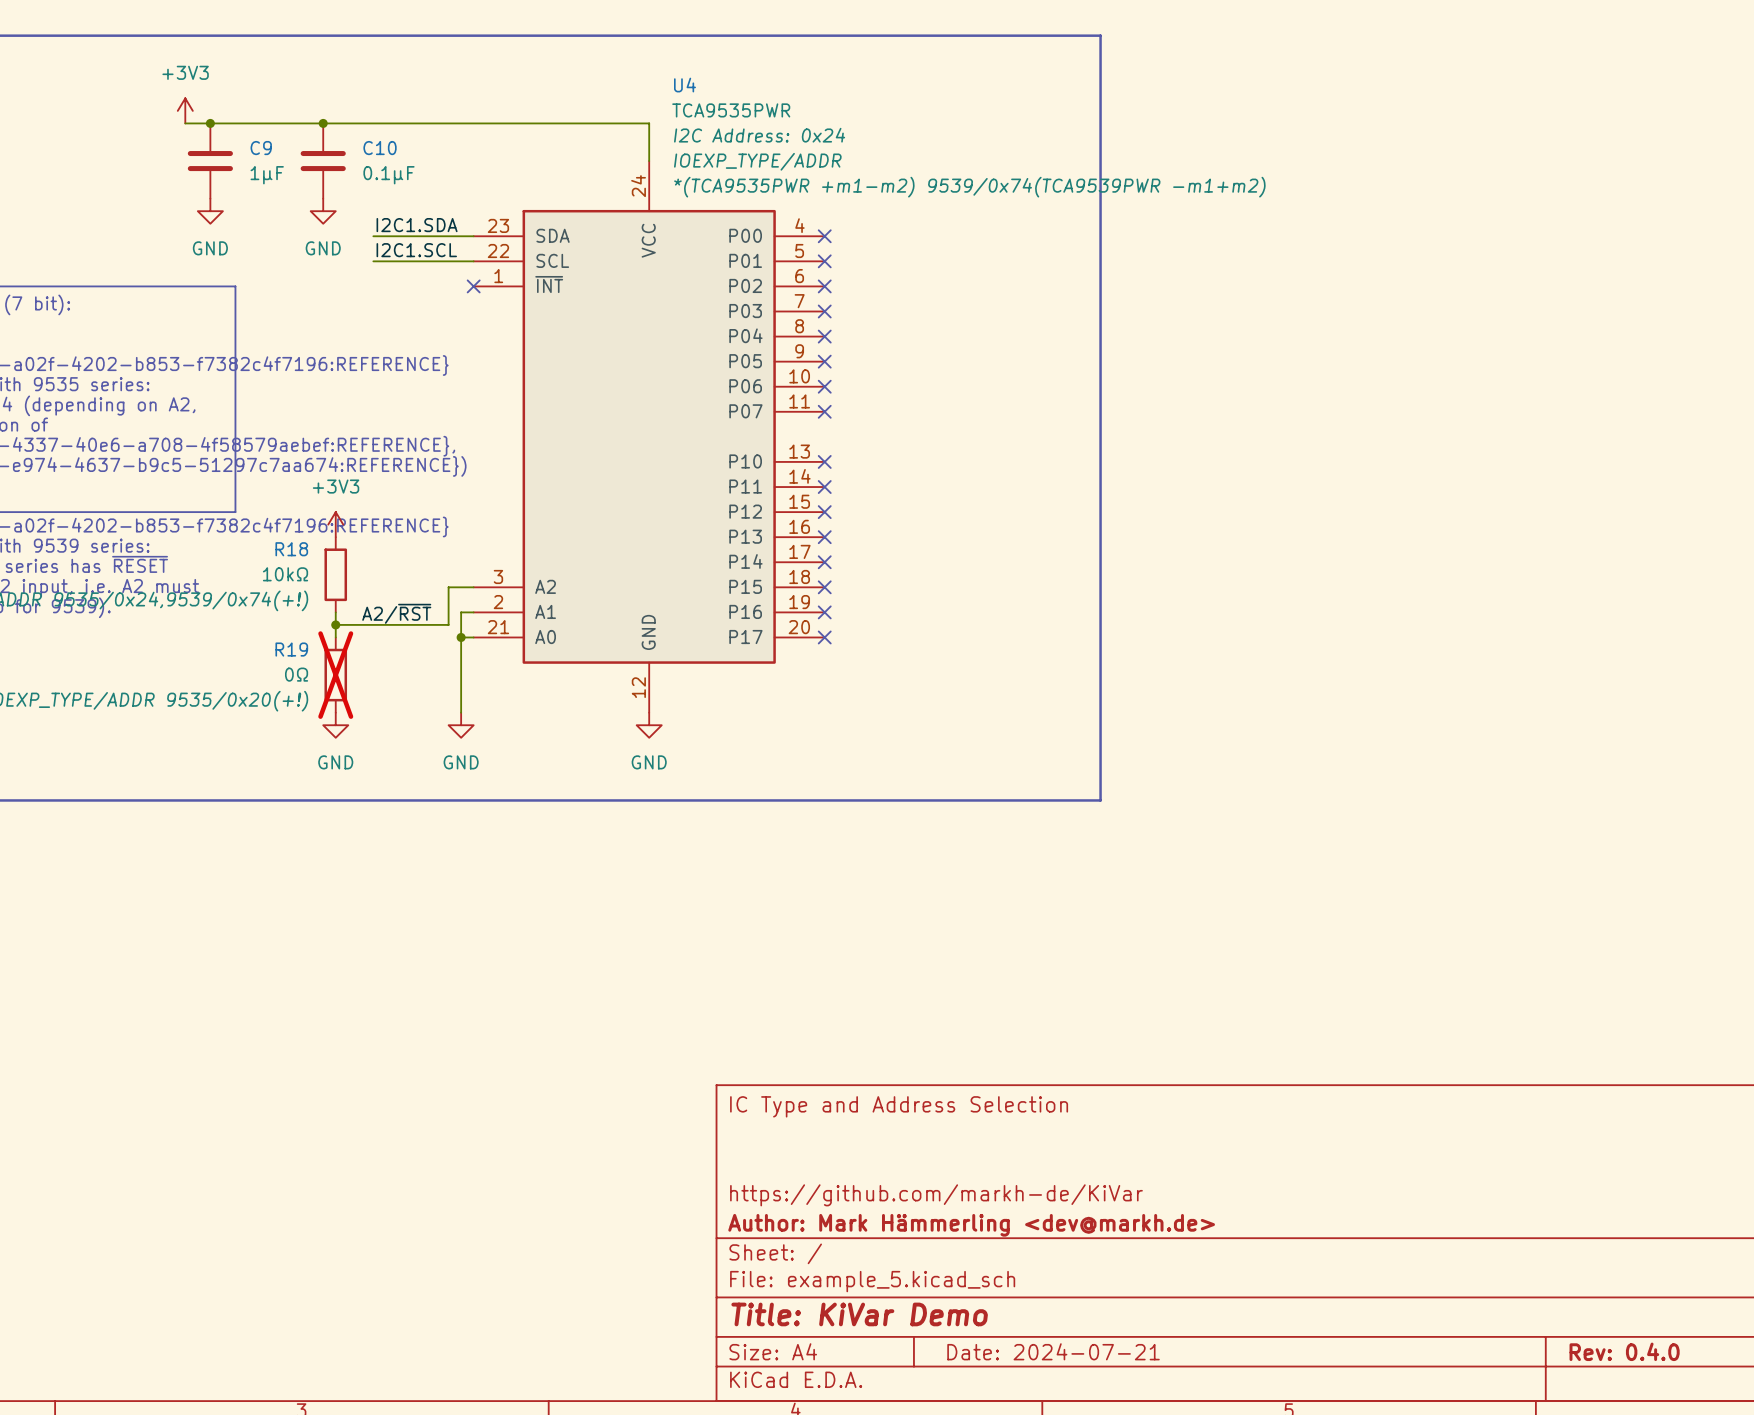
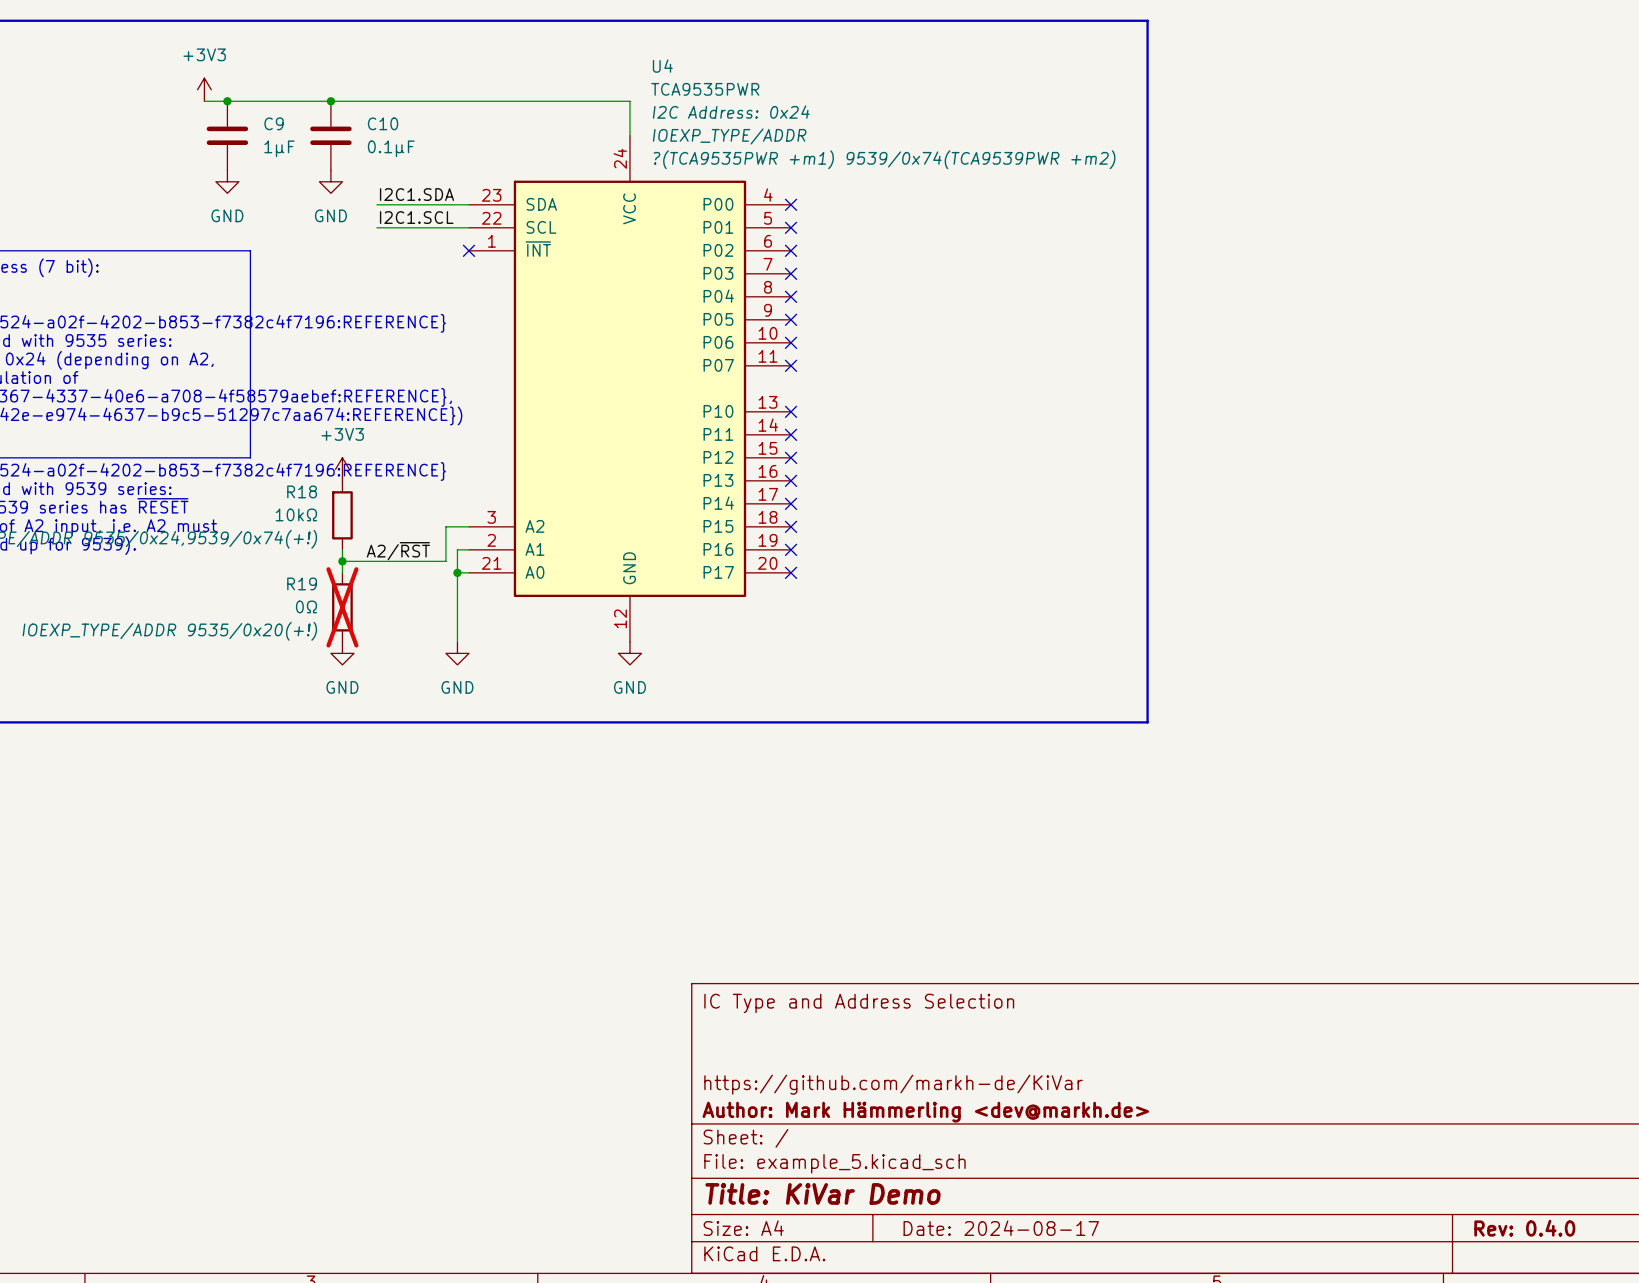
line: (1100, 35) (1100, 800) -> (1044, 20) (1147, 20) (1147, 722) (1044, 722)
U4 text: *(TCA9535PWR +m1-m2) 9539/0x74(TCA9539PWR -m1+m2) (969, 187) -> ?(TCA9535PWR +m1) 9539/0x74(TCA9539PWR +m2) (884, 159)
title block: Date: 2024-07-21 (1053, 1351) -> Date: 2024-08-17 (1001, 1228)

